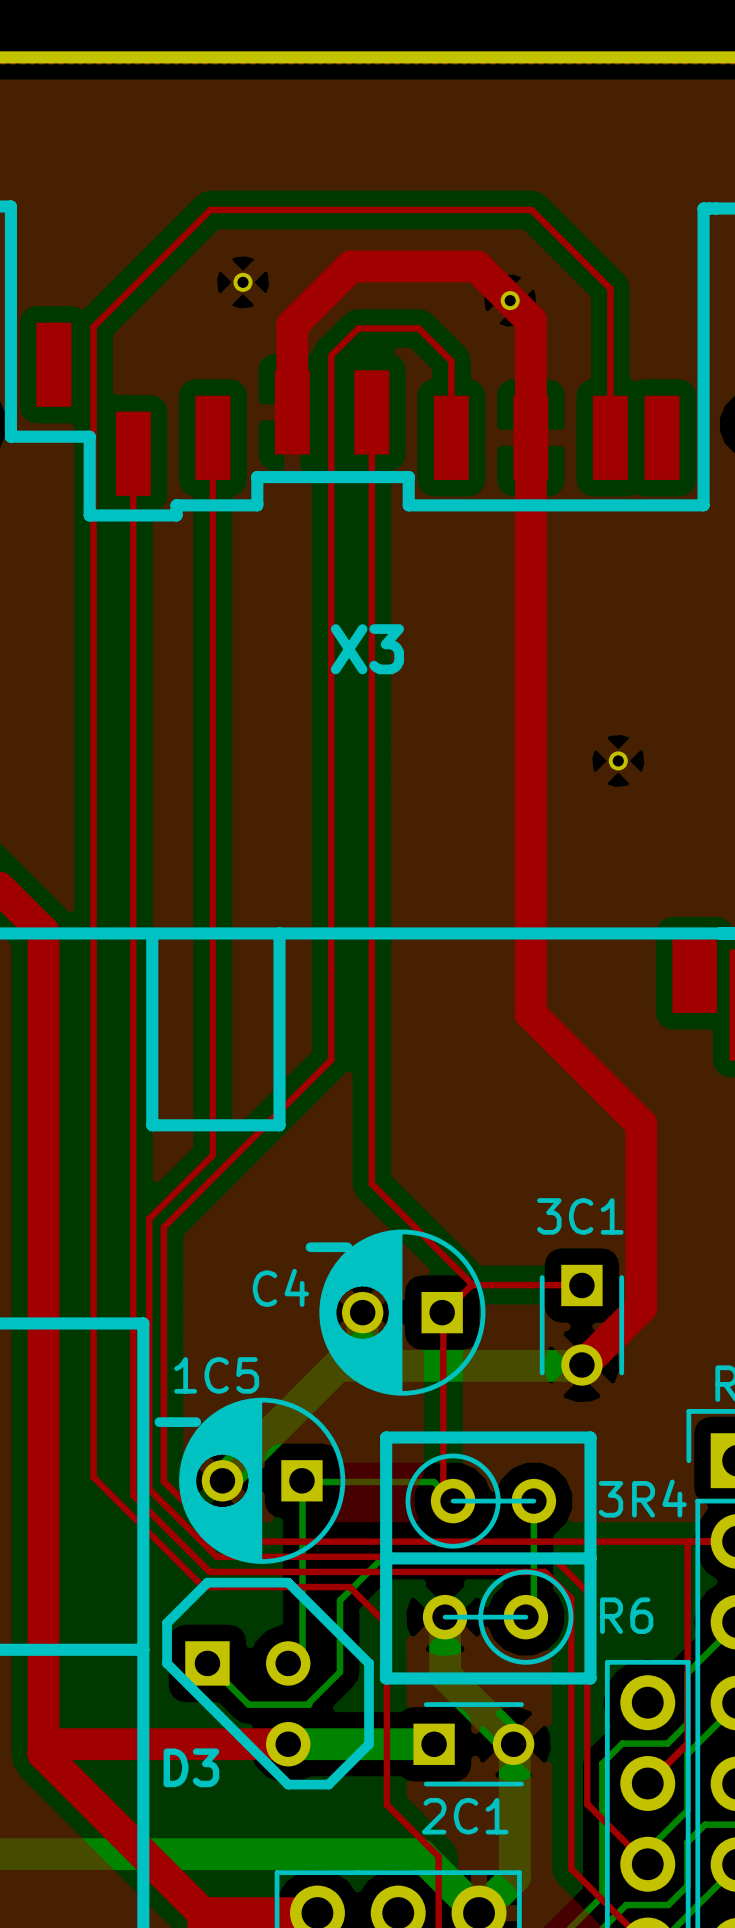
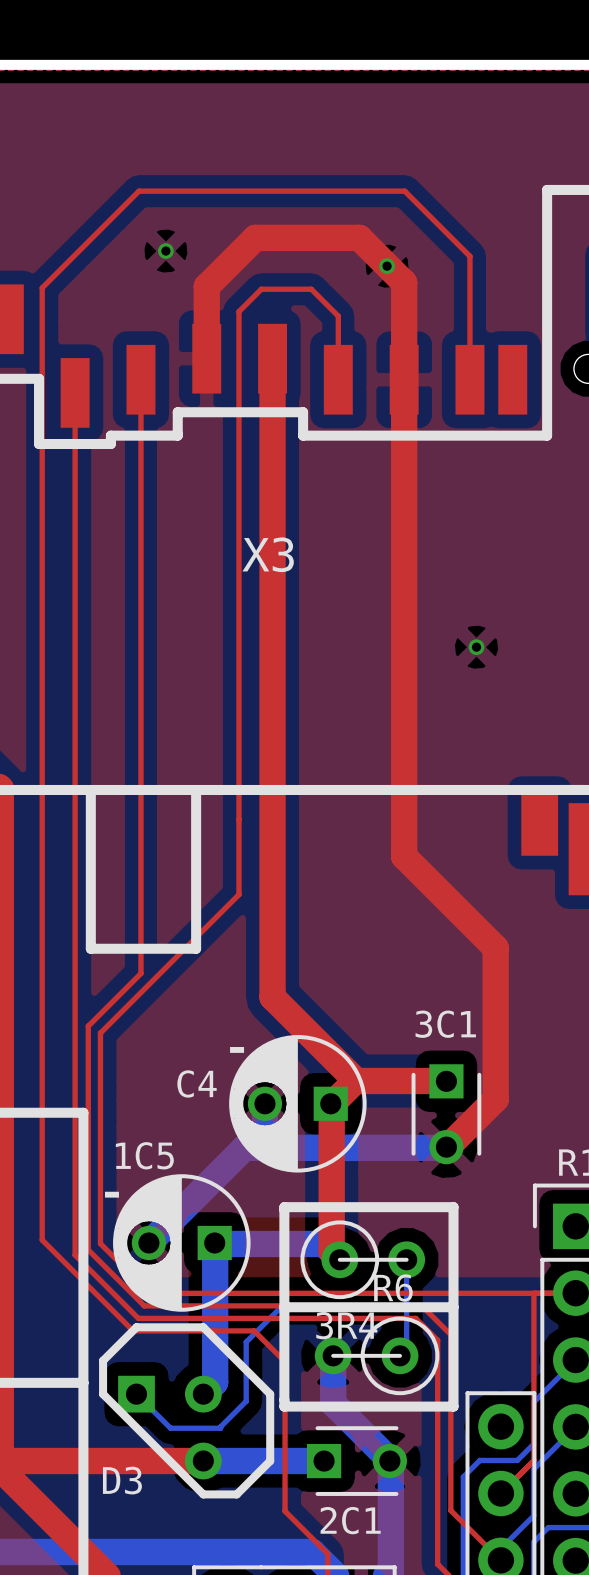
top track width: thin (371, 412) (371, 1183) (472, 1285) -> thick (272, 358) (272, 997) (356, 1081)
top track width: thin (582, 1285) (471, 1285) (443, 1313) (443, 1491) (453, 1501) -> thick (447, 1081) (355, 1081) (331, 1104) (331, 1251) (339, 1259)
3R4 name position: 3R4 (642, 1498) -> 3R4 (346, 1325)
bottom track width: thin (453, 1501) (434, 1482) (302, 1482) (302, 1649) (288, 1663) -> thick (339, 1259) (324, 1243) (215, 1243) (215, 1382) (203, 1394)
R6 name position: R6 (626, 1615) -> R6 (393, 1288)

